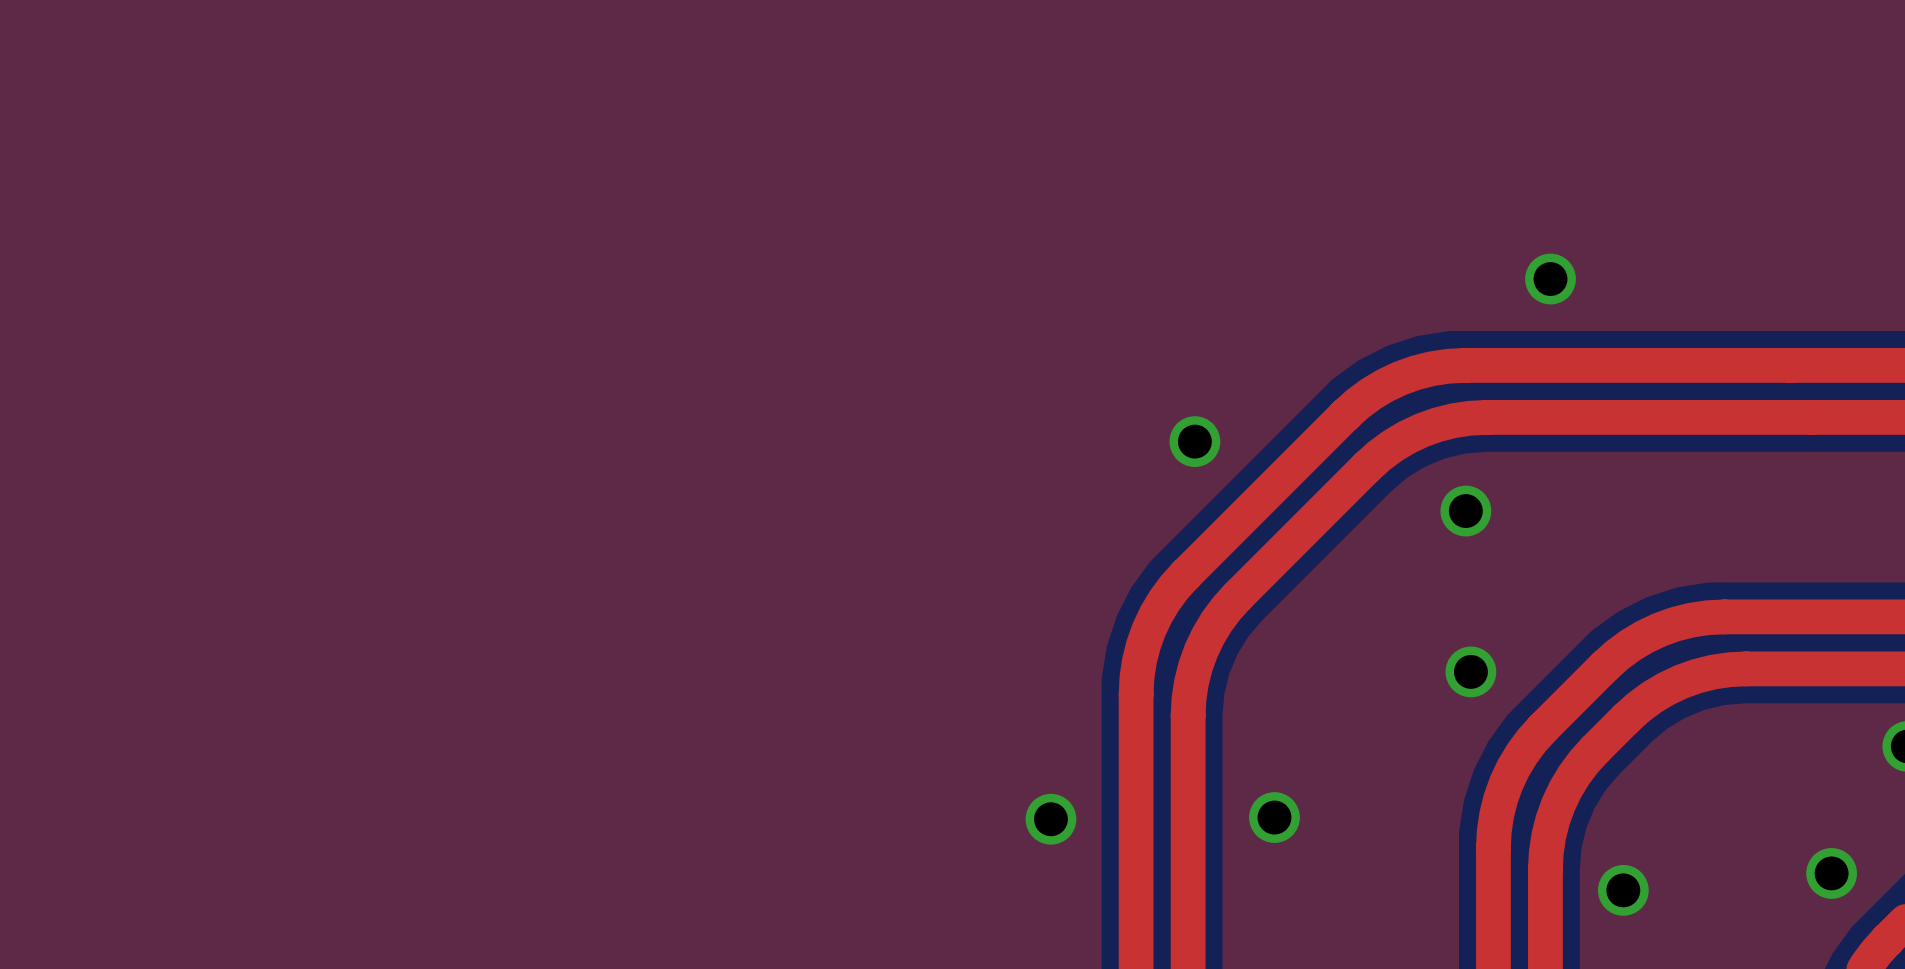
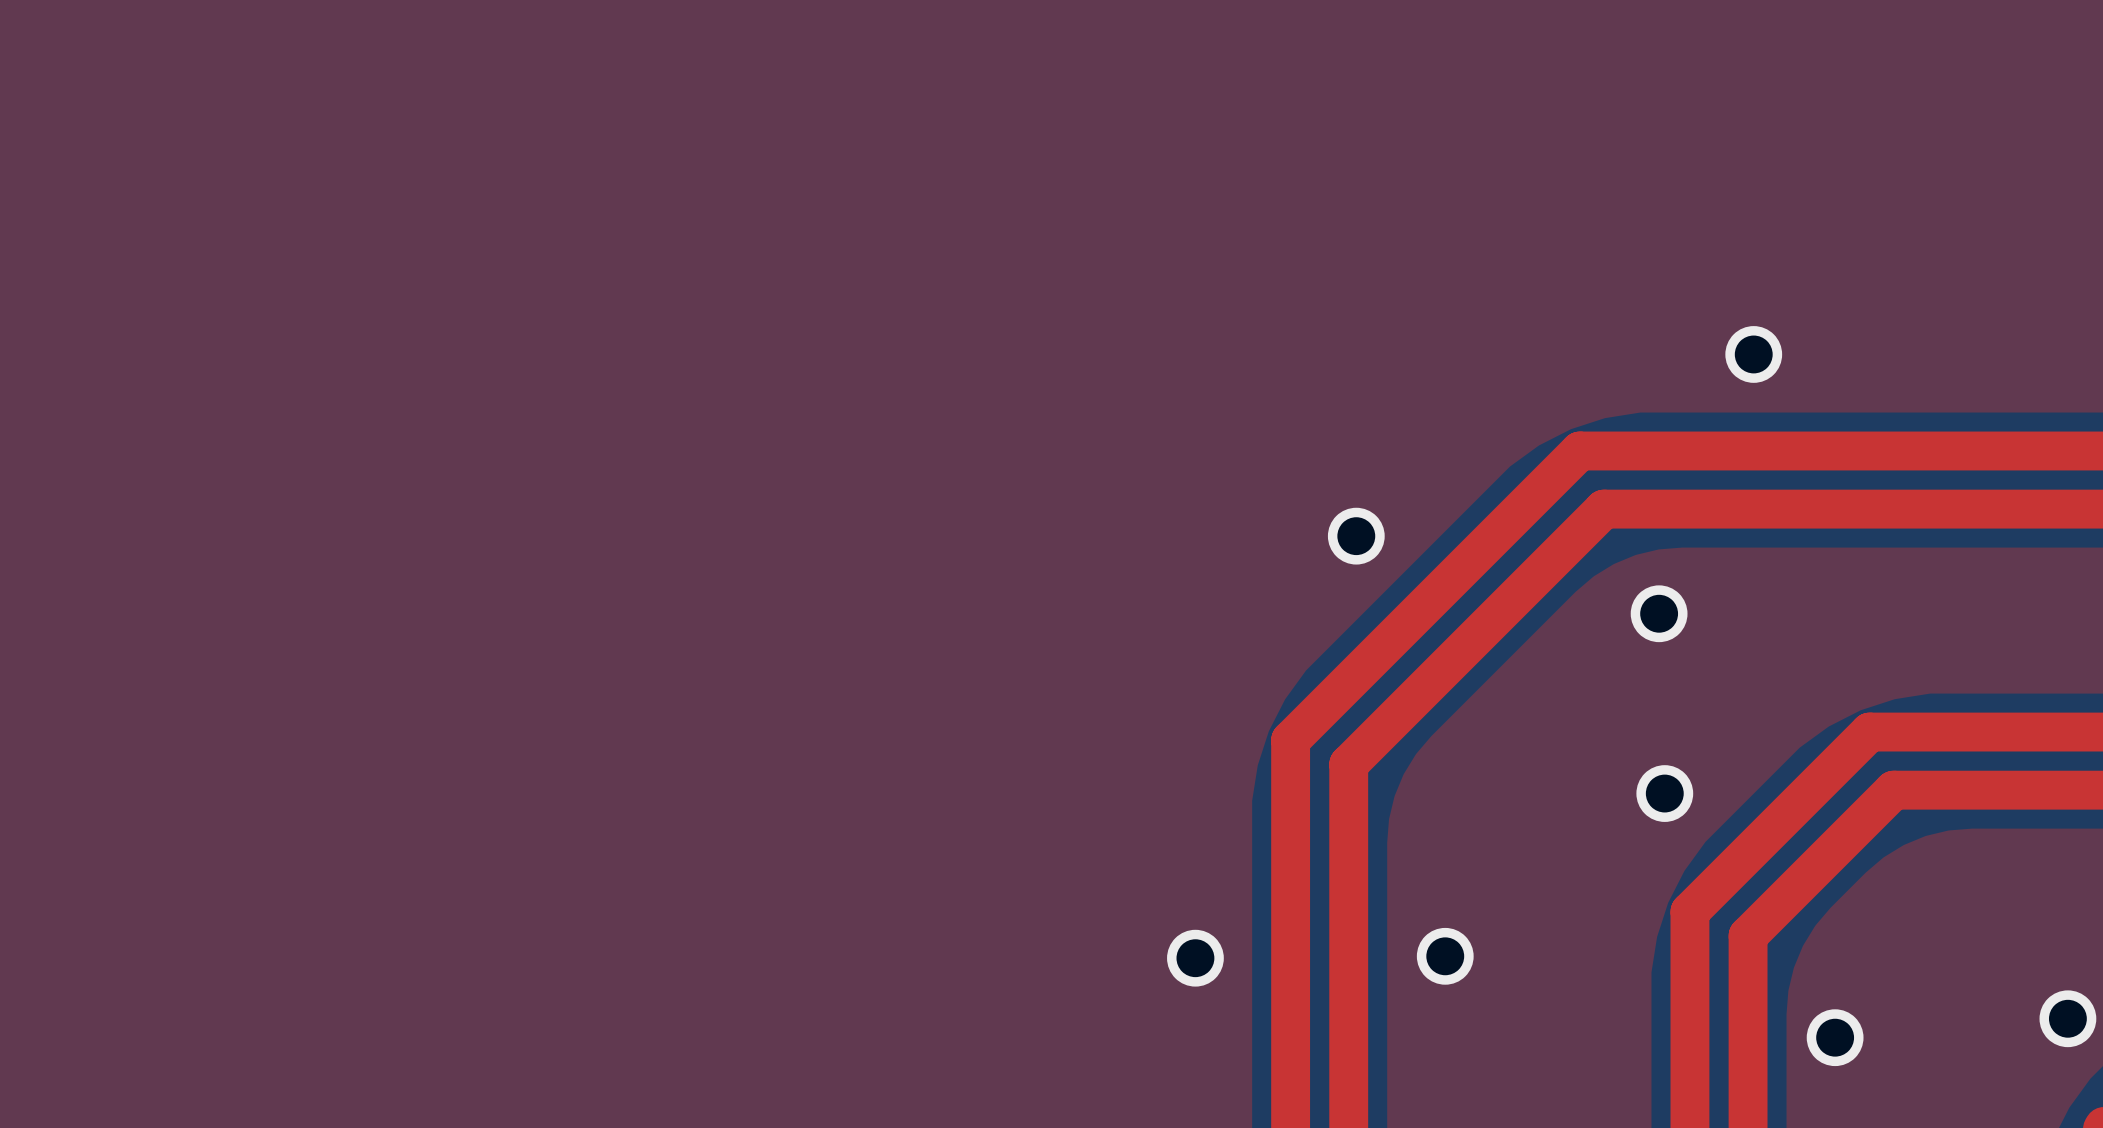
top track: (1465, 365) (1432, 368) (1400, 378) (1371, 393) (1345, 415) -> (1658, 450) (1579, 450) (1524, 506)
top track: (1486, 417) (1453, 420) (1421, 430) (1392, 445) (1366, 467) -> (1682, 509) (1603, 509) (1548, 564)
top track: (1185, 574) (1164, 600) (1149, 629) (1139, 661) (1136, 694) -> (1346, 684) (1290, 740) (1290, 818)
top track: (1237, 596) (1216, 621) (1201, 651) (1191, 682) (1188, 715) -> (1404, 708) (1348, 764) (1348, 842)
top track: (1724, 616) (1691, 620) (1659, 629) (1630, 645) (1604, 666) -> (1948, 732) (1869, 732) (1814, 787)
top track: (1745, 668) (1712, 672) (1681, 681) (1651, 697) (1626, 718) -> (1972, 790) (1893, 790) (1838, 845)
top track: (1543, 728) (1521, 753) (1506, 783) (1496, 814) (1493, 847) -> (1745, 856) (1689, 911) (1689, 990)
top track: (1595, 749) (1573, 775) (1558, 804) (1548, 836) (1545, 869) -> (1803, 880) (1748, 935) (1748, 1014)

